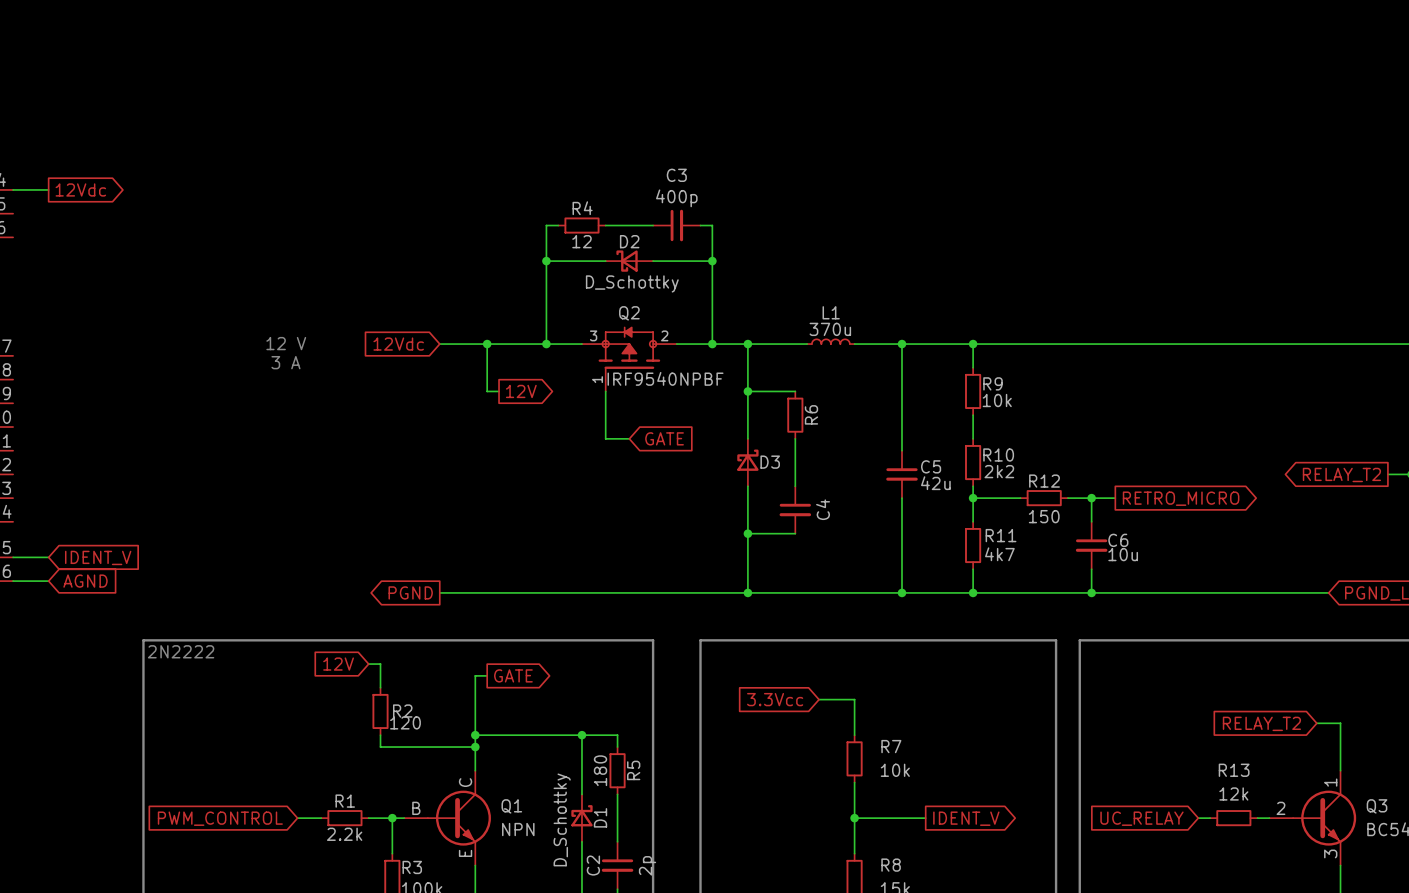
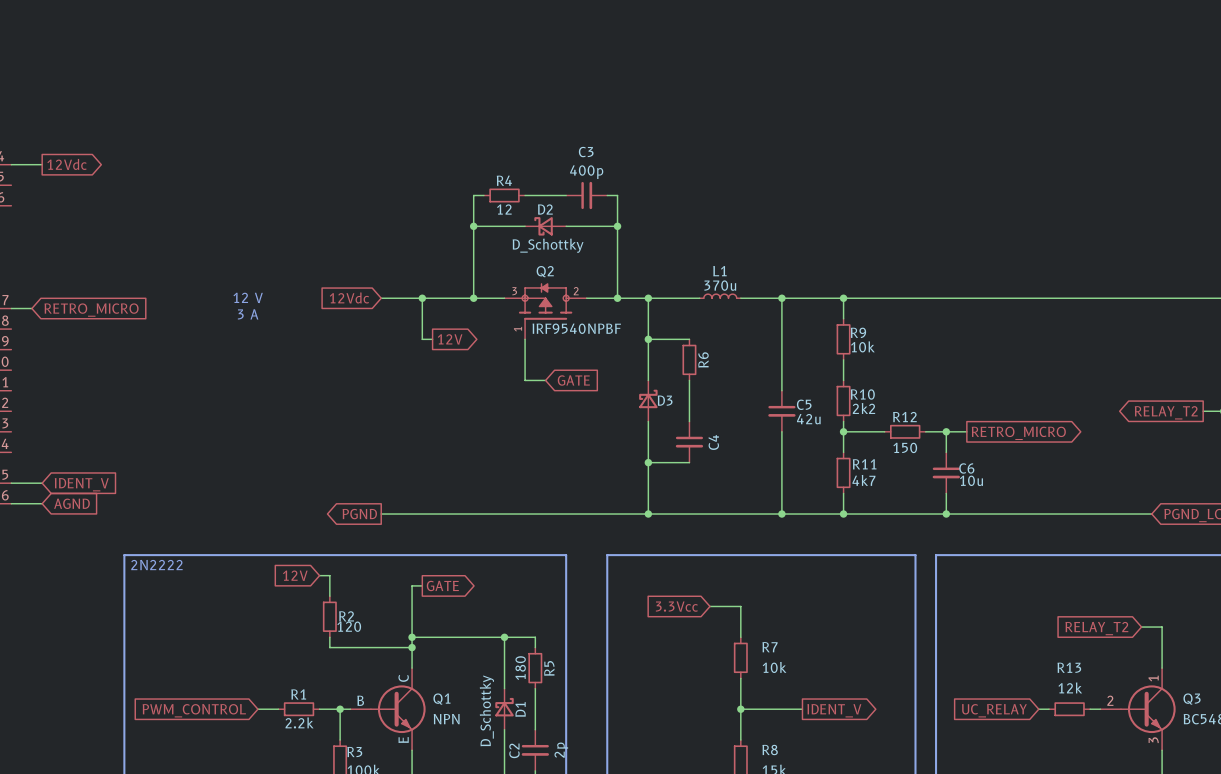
wire: none -> (11, 308) (31, 308)
global label: none -> RETRO_MICRO (91, 310)

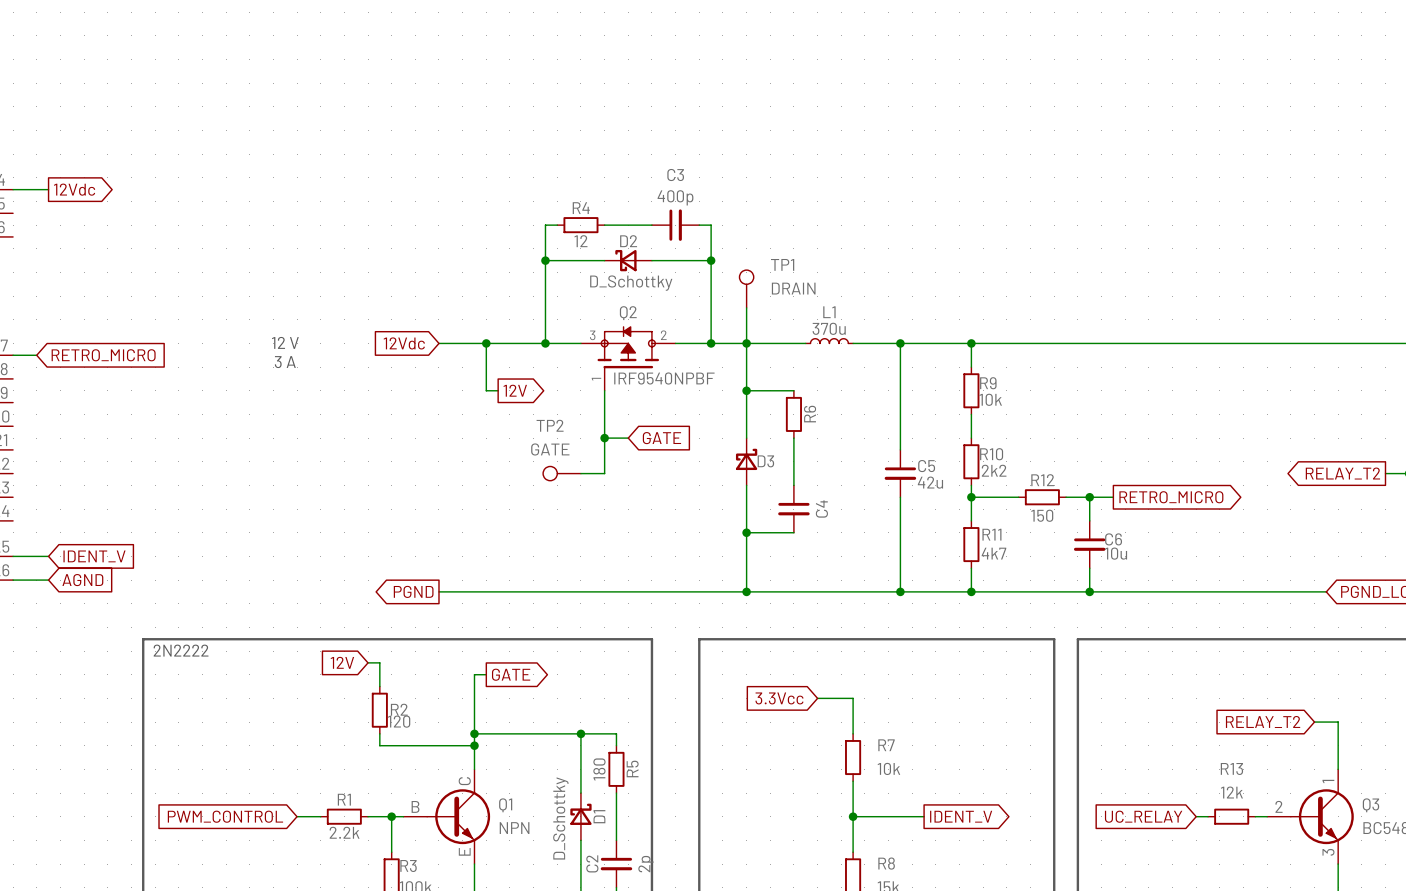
TP1: none -> DRAIN (746, 289)
wire: none -> (746, 307) (746, 343)
wire: none -> (604, 438) (604, 473) (580, 473)
junction: none -> (604, 438)
TP2: none -> GATE (562, 473)

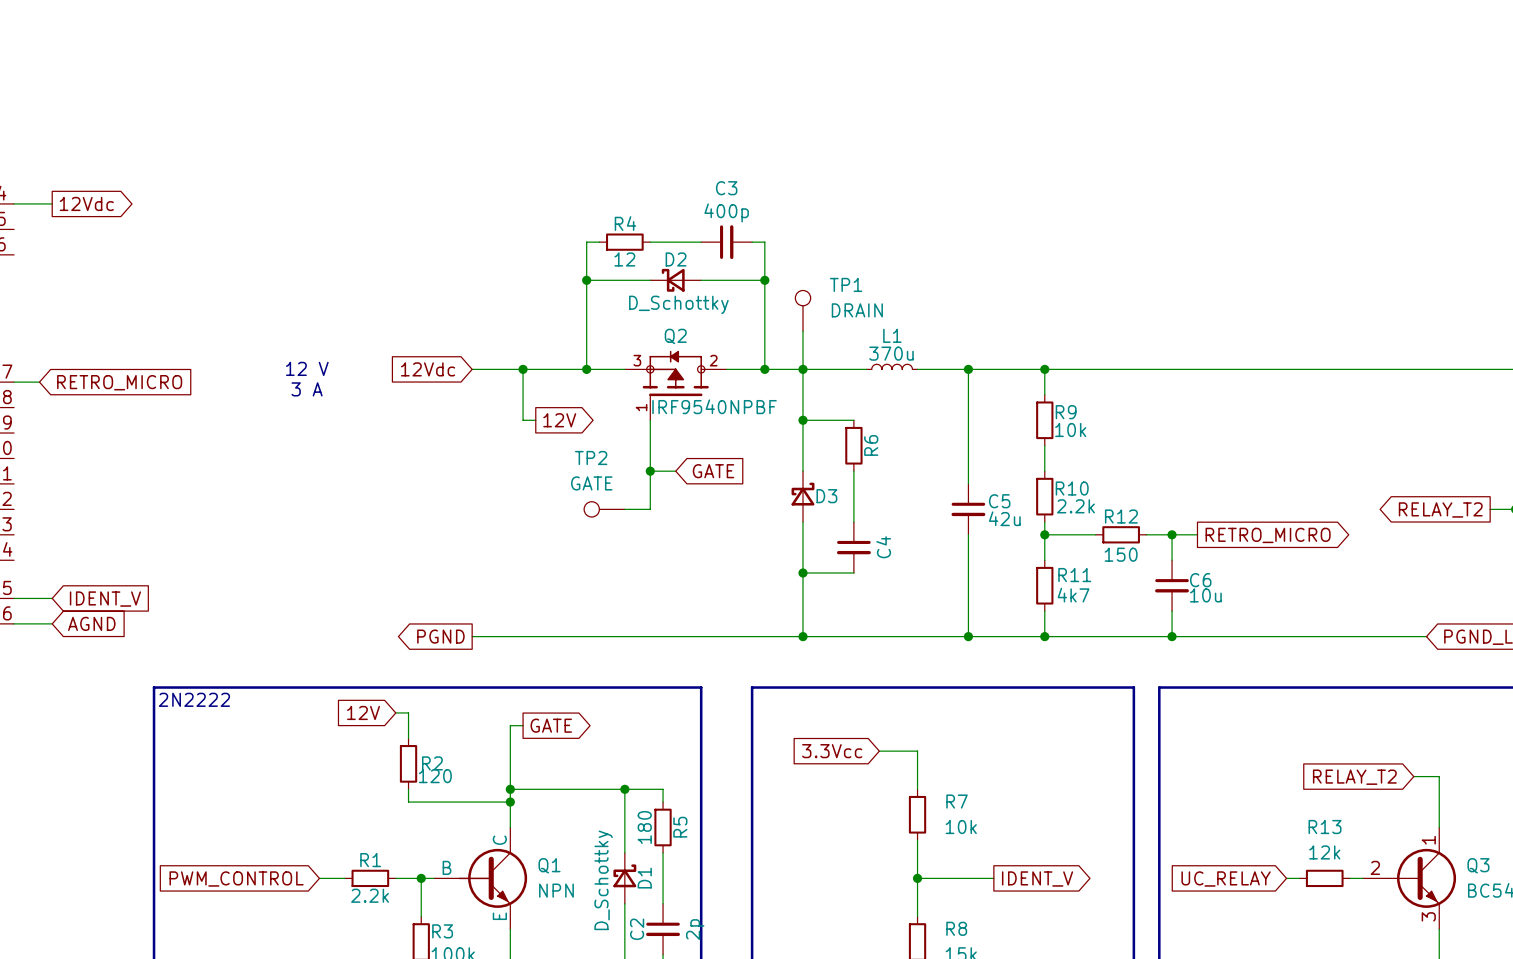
R10 value: 2k2 (994, 470) -> 2.2k (1075, 506)

